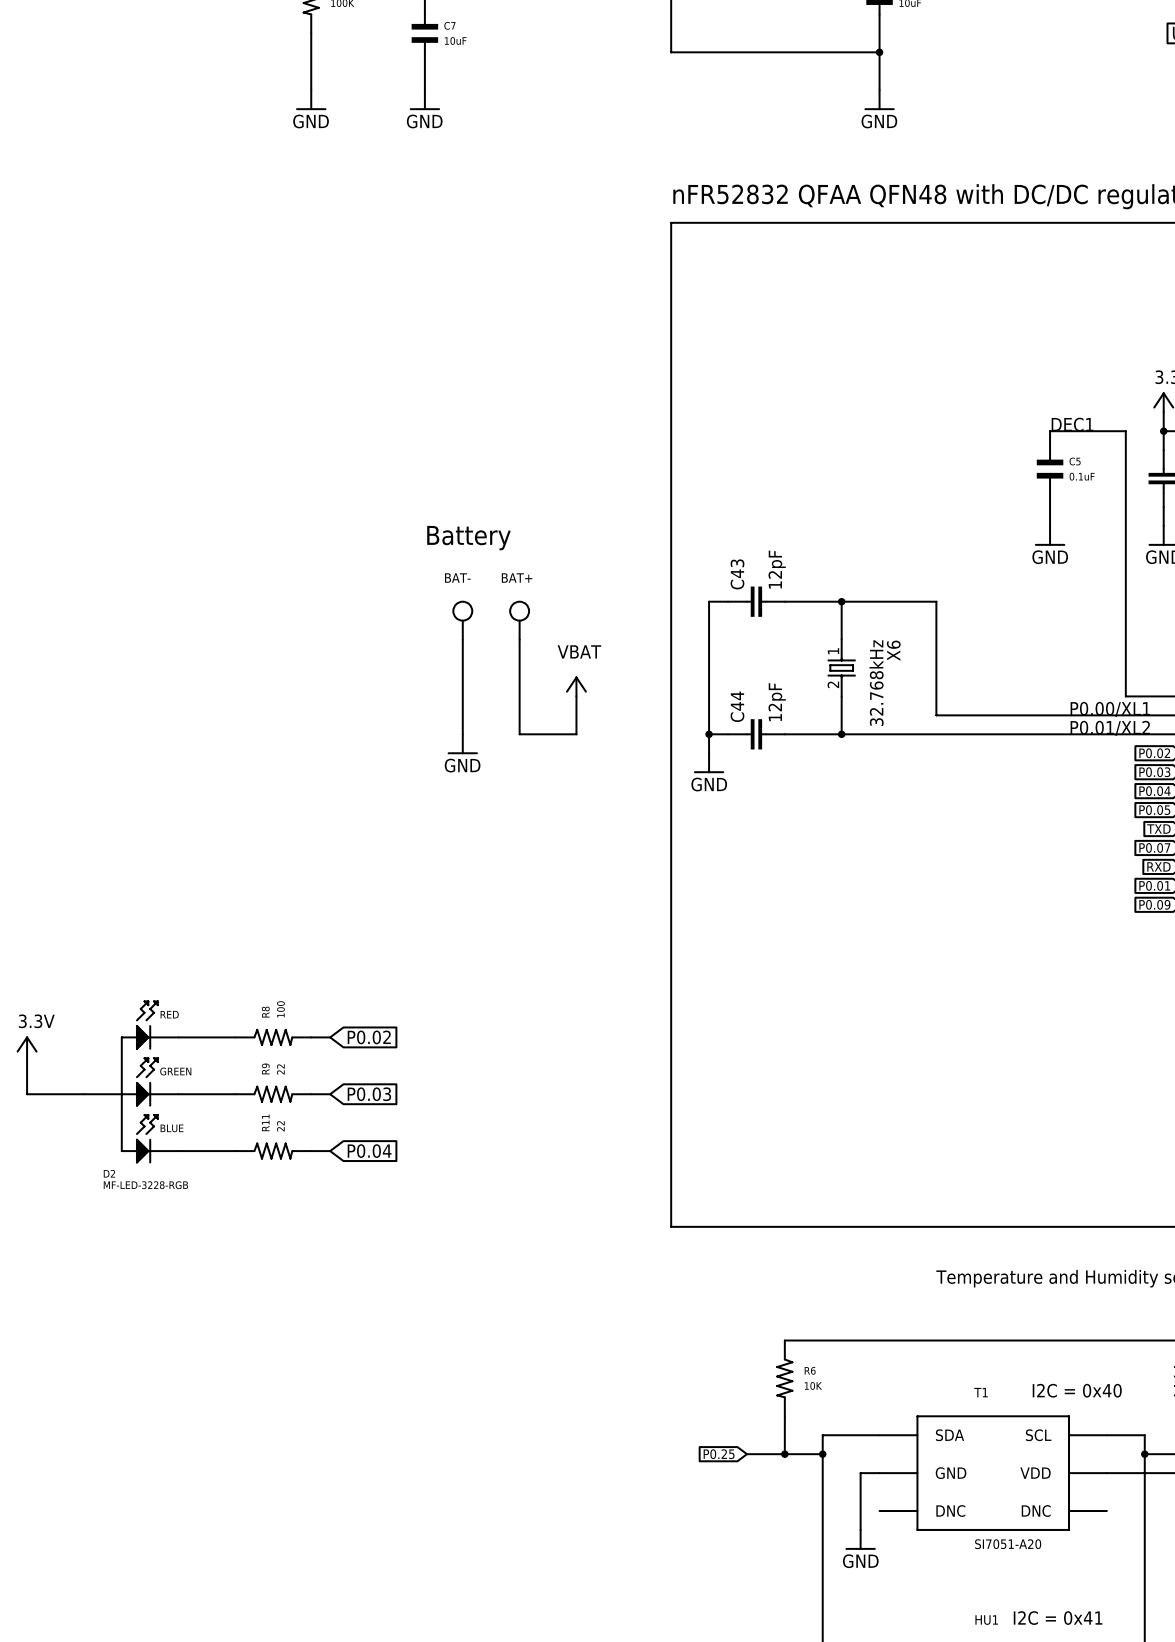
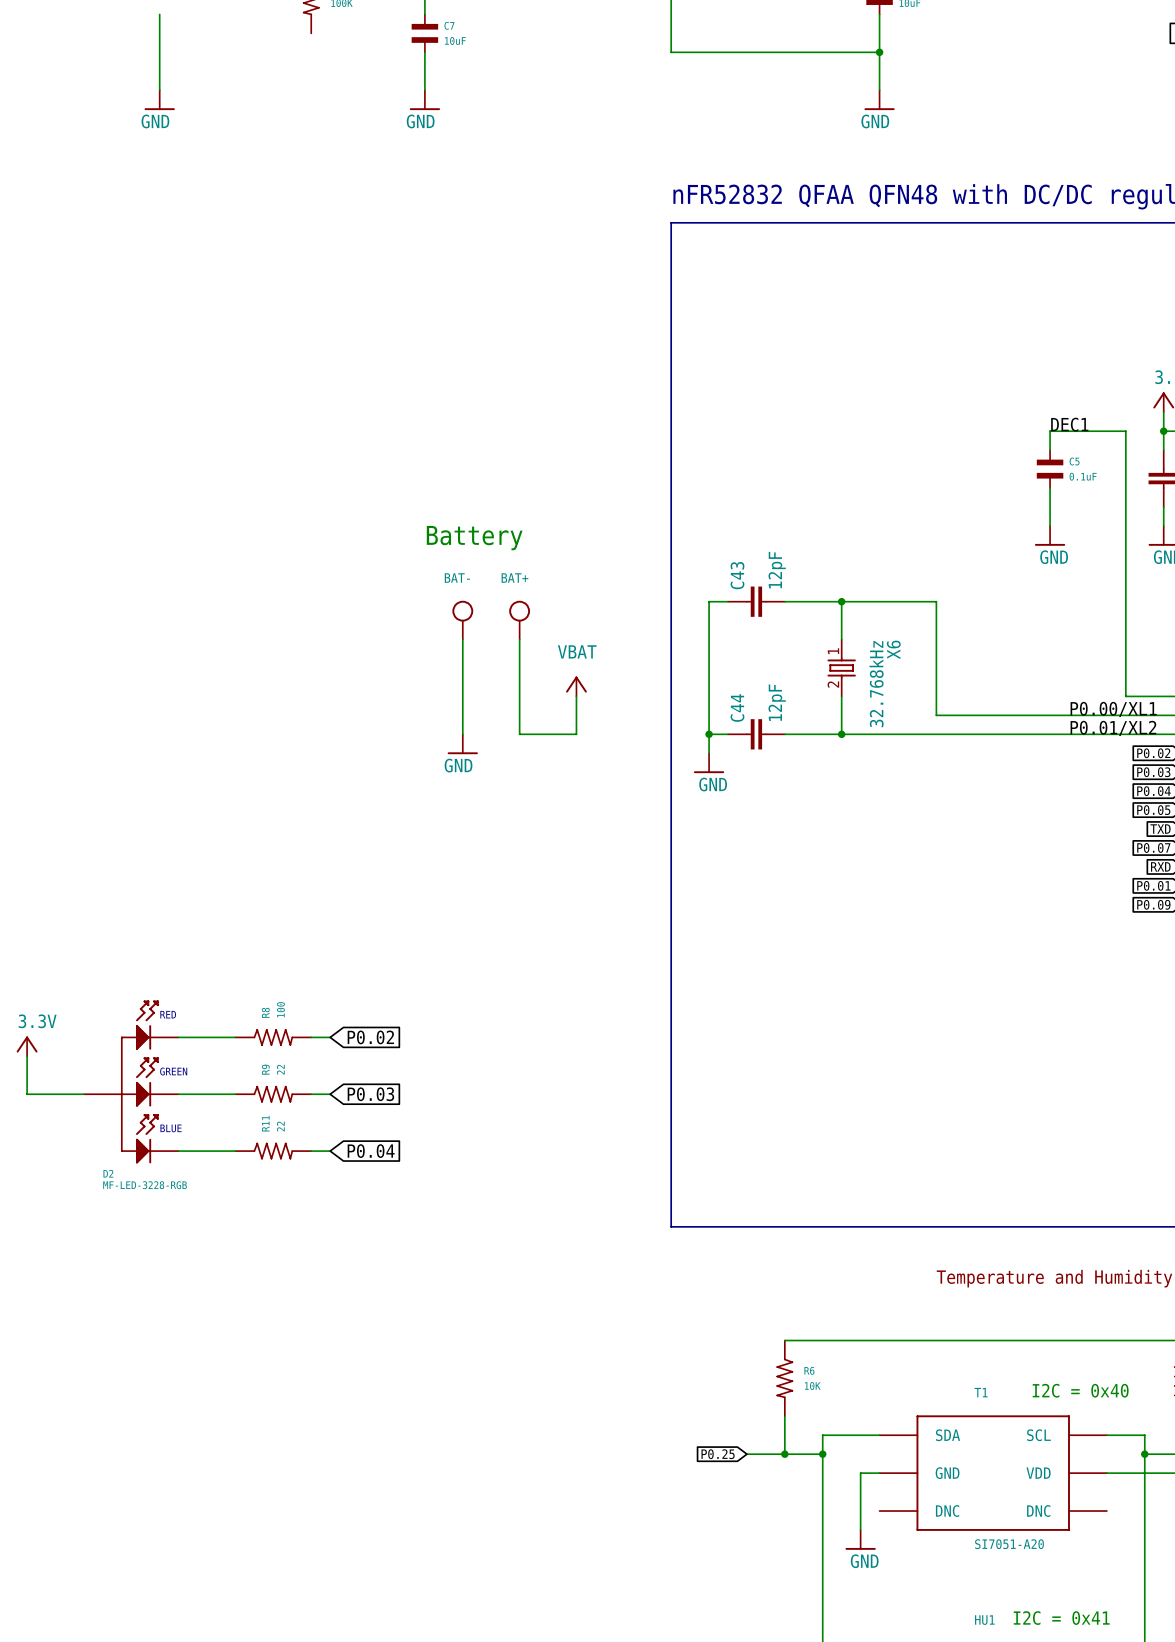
wire: none -> (159, 14) (159, 90)
wire: (311, 33) (311, 90) -> none
power symbol position: GND (311, 100) -> GND (159, 100)

